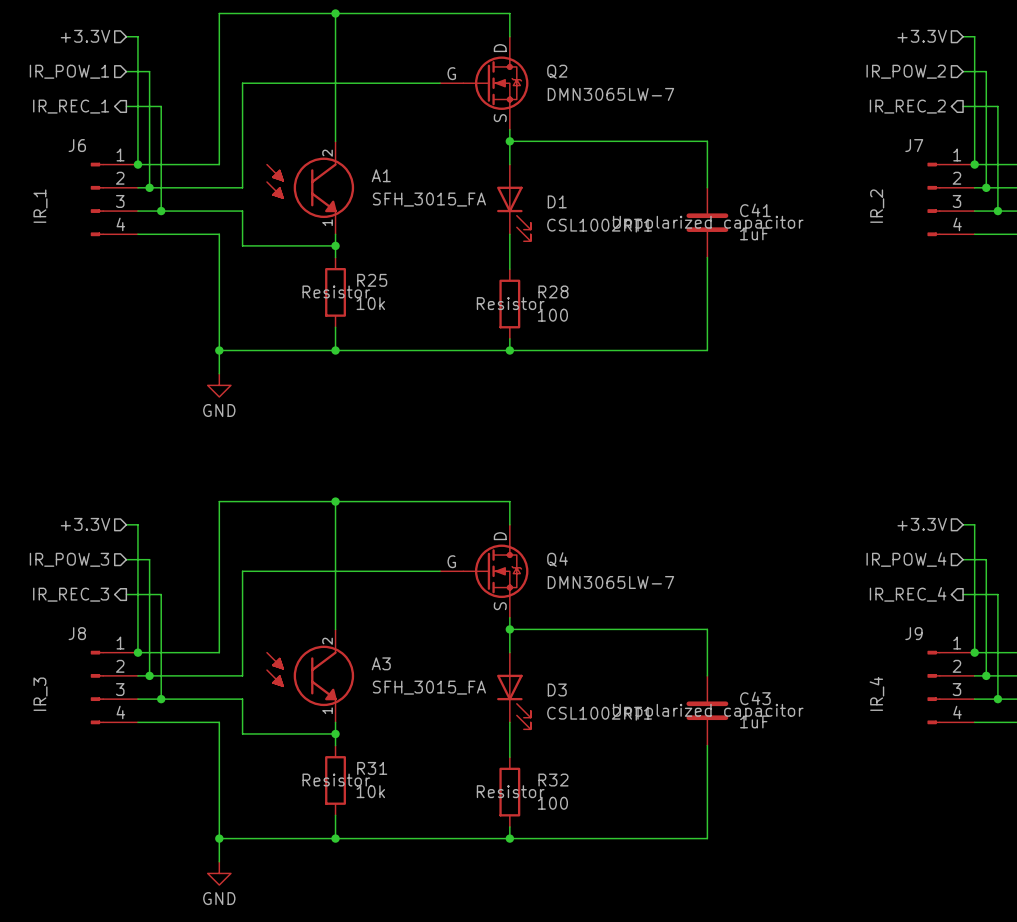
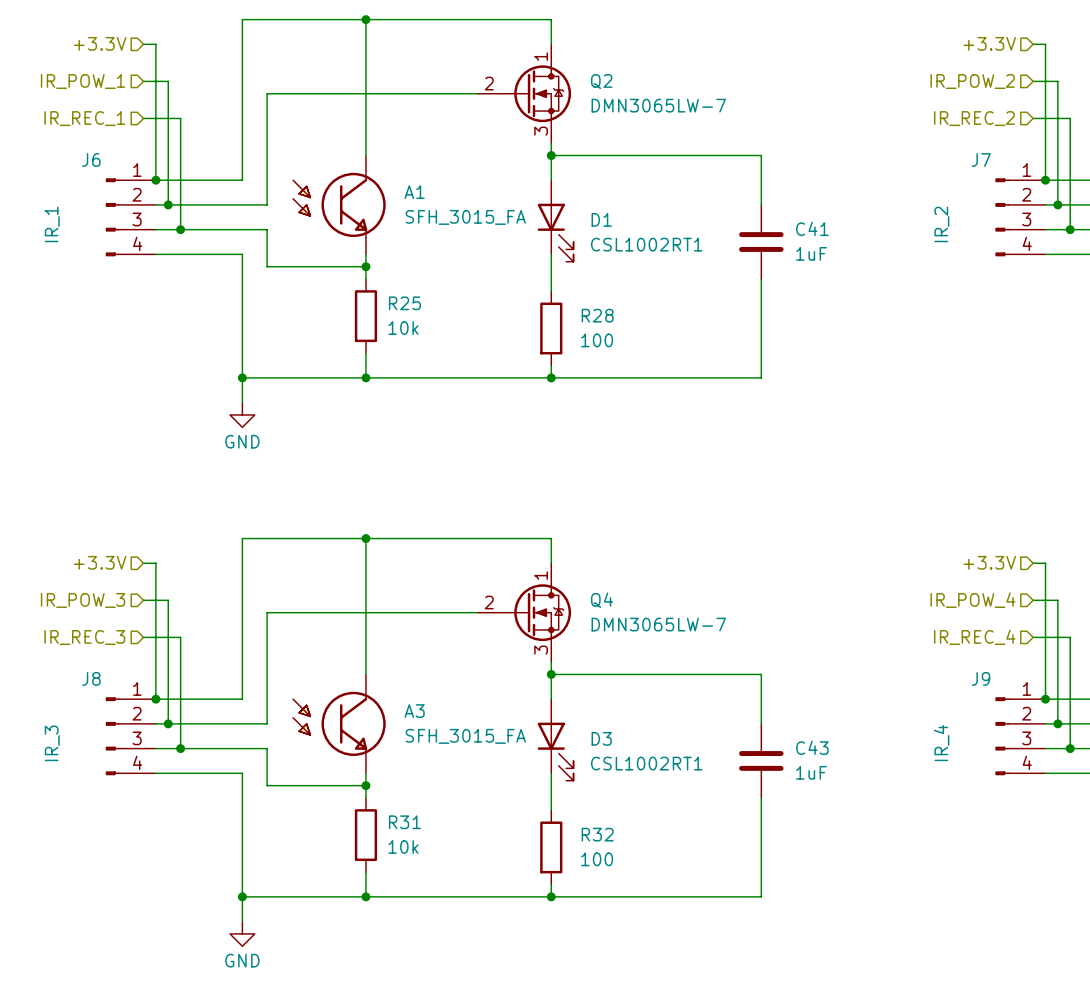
Q2 pin name: D (500, 48) -> none
Q2 pin number: none -> 1 (541, 56)
Q2 pin name: G (451, 73) -> none
Q2 pin number: none -> 2 (489, 83)
hierarchical label shape: output (71, 106) -> input (84, 118)
hierarchical label shape: output (907, 106) -> input (974, 118)
Q2 pin name: S (500, 118) -> none
Q2 pin number: none -> 3 (541, 131)
A1 symbol: [266, 141, 355, 235] -> [292, 155, 386, 255]
C41 text: Unpolarized capacitor (708, 224) -> none
R25 text: Resistor (336, 291) -> none
R28 text: Resistor (510, 303) -> none
Q4 pin name: D (500, 536) -> none
Q4 pin number: none -> 1 (541, 575)
Q4 pin name: G (451, 561) -> none
Q4 pin number: none -> 2 (489, 602)
hierarchical label shape: output (71, 594) -> input (84, 637)
hierarchical label shape: output (908, 594) -> input (974, 637)
Q4 pin name: S (500, 606) -> none
Q4 pin number: none -> 3 (541, 650)
A3 symbol: [266, 629, 355, 723] -> [292, 674, 386, 774]
C43 text: Unpolarized capacitor (708, 712) -> none
R31 text: Resistor (336, 780) -> none
R32 text: Resistor (510, 791) -> none

